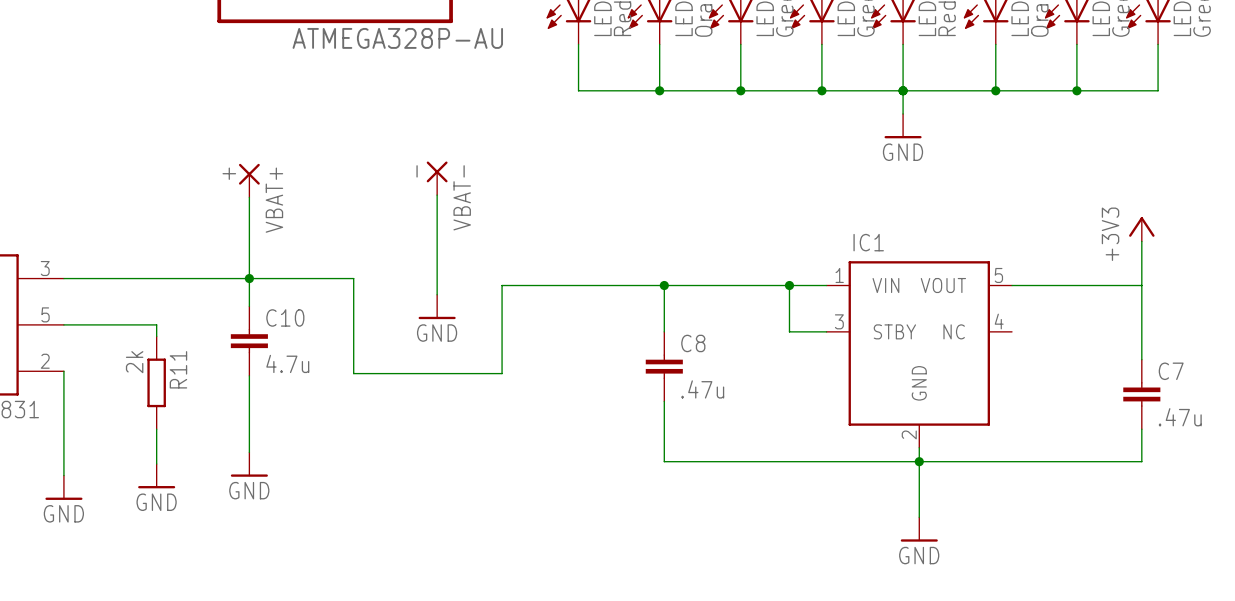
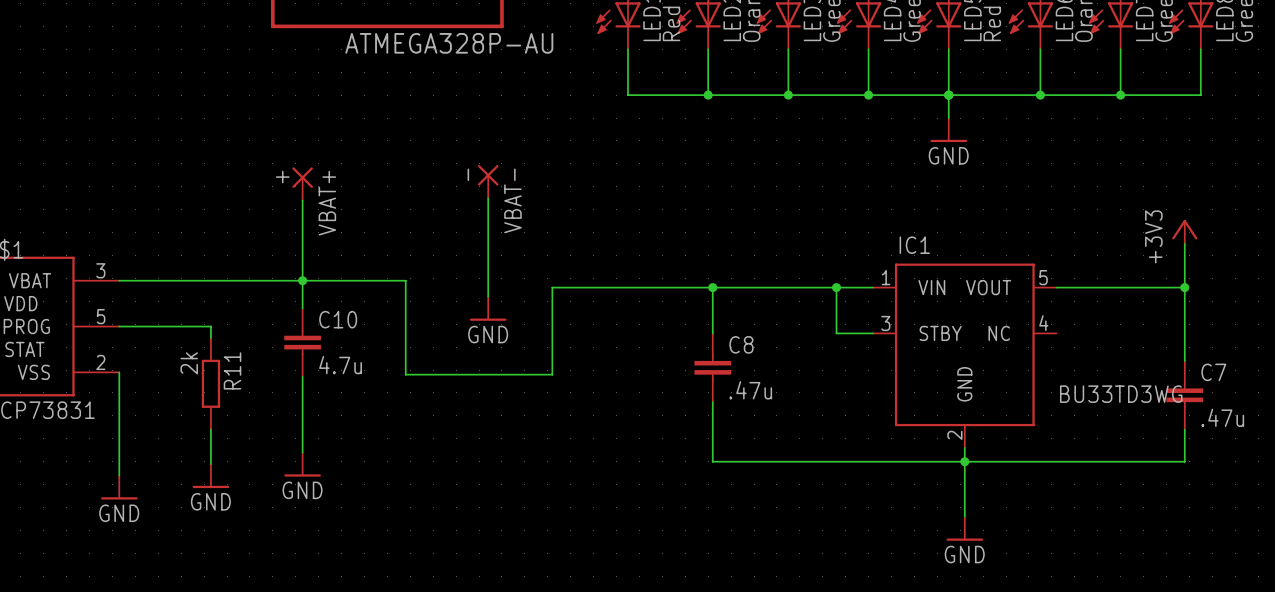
junction: none -> (1184, 287)
IC1 value: none -> BU33TD3WG (1121, 394)

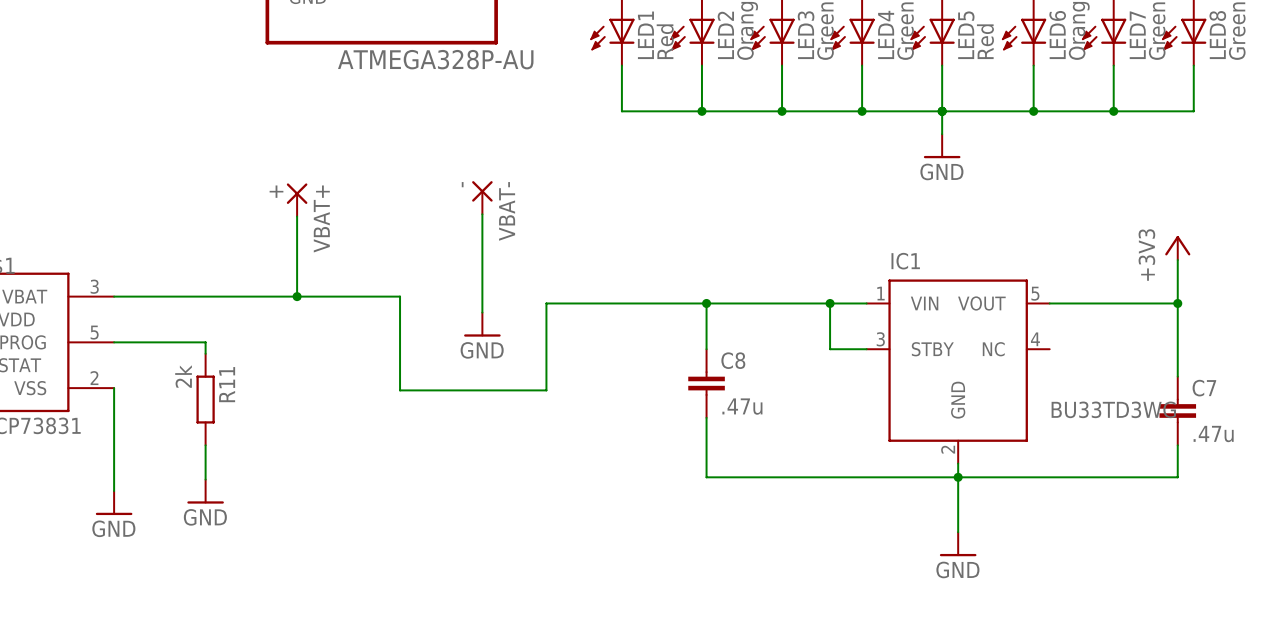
wire: (302, 283) (302, 308) -> none
C10: 4.7u (302, 342) -> none
wire: (302, 376) (302, 452) -> none
power symbol: GND (302, 464) -> none

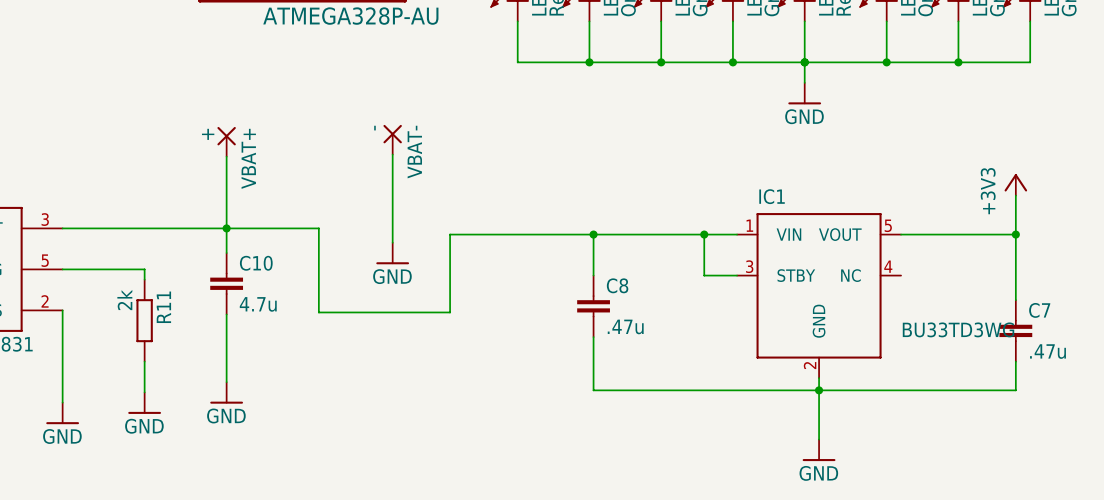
wire: none -> (226, 230) (226, 253)
C10: none -> 4.7u (226, 283)
wire: none -> (226, 314) (226, 382)
power symbol: none -> GND (226, 392)

